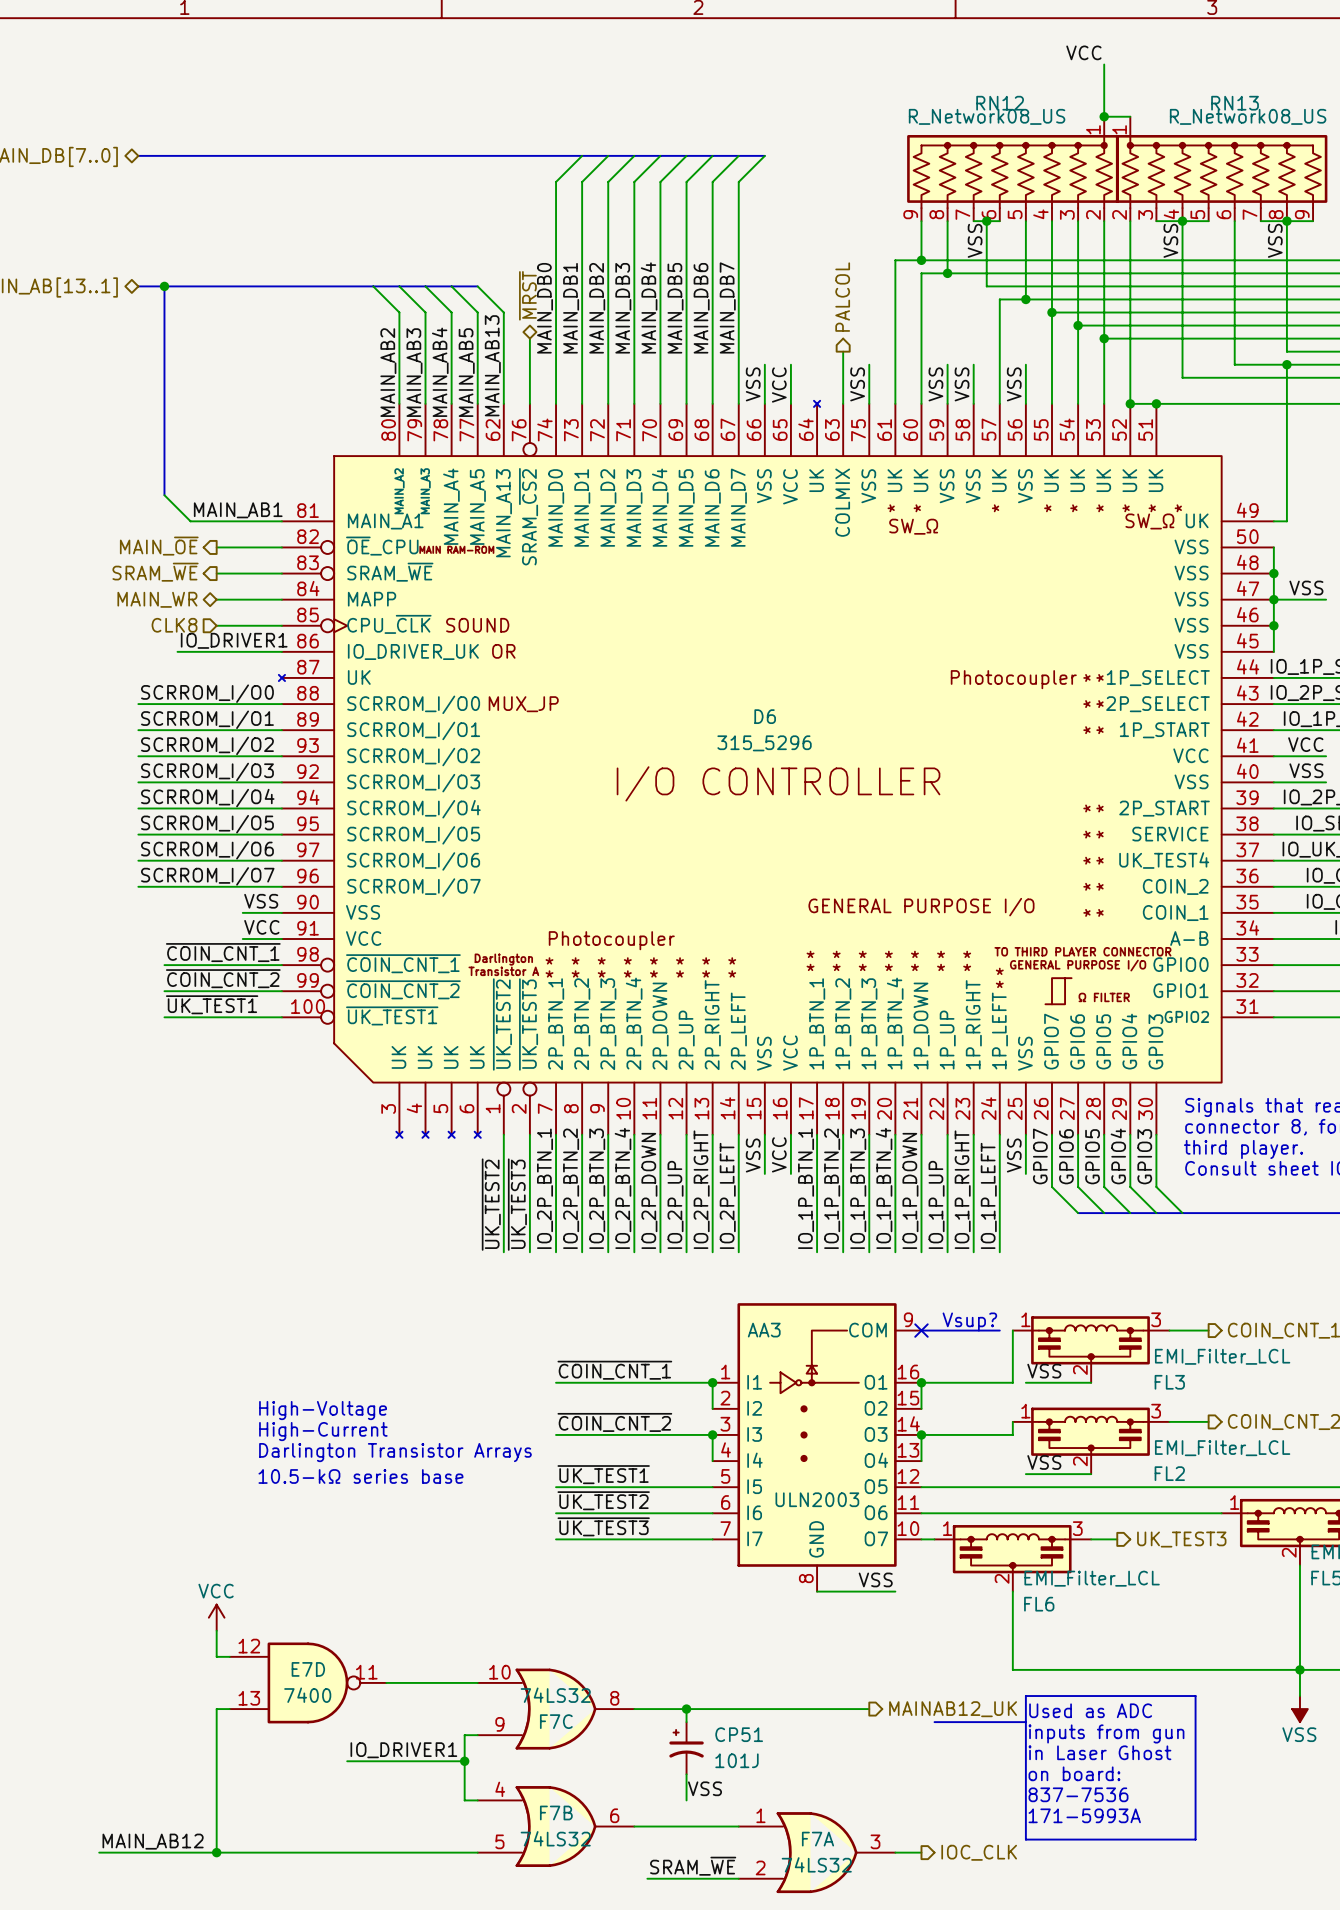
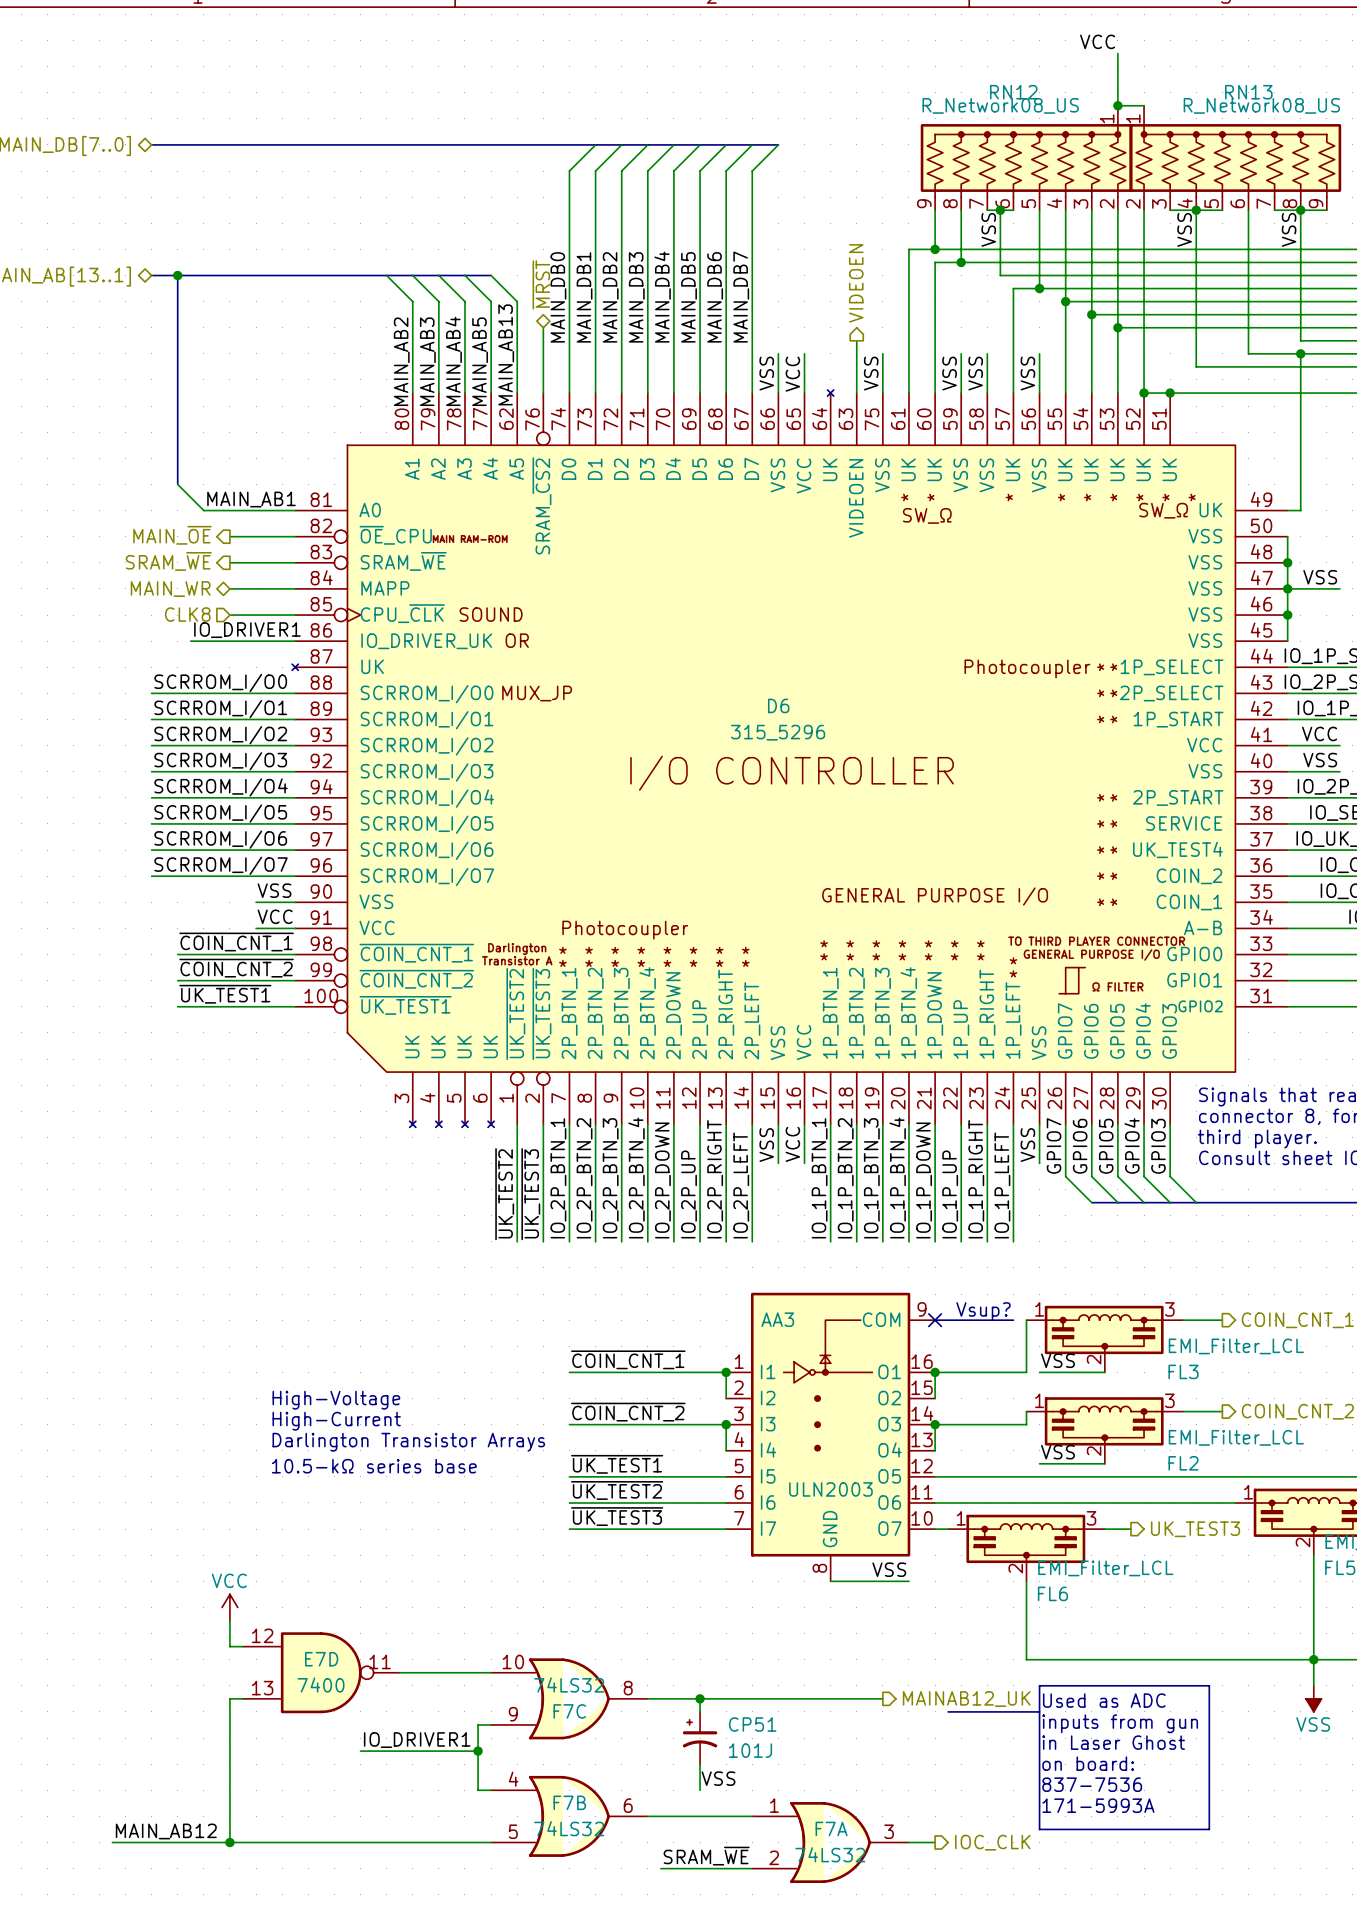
hierarchical label: PALCOL (842, 297) -> VIDEOEN (856, 283)
D6 symbol: [278, 400, 1274, 1138] -> [292, 389, 1288, 1128]

